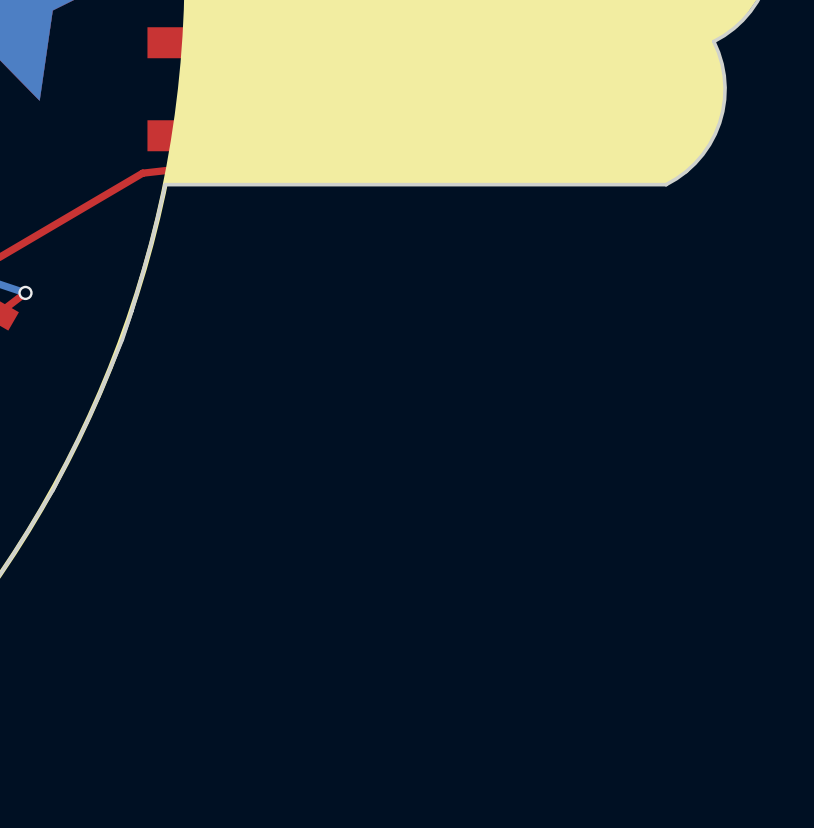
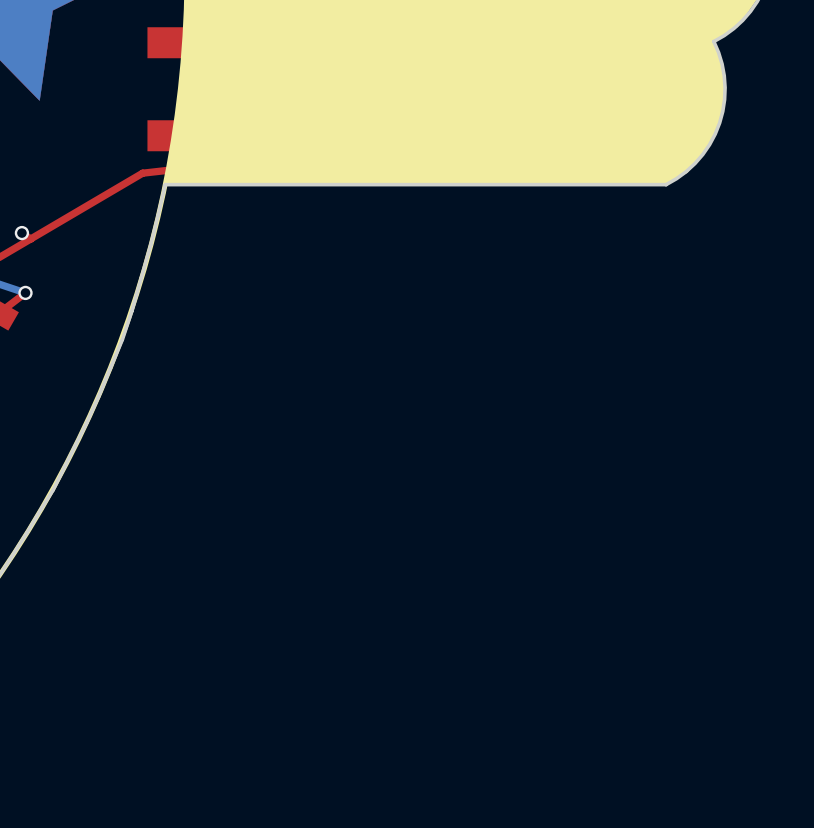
via: none -> (21, 233)

